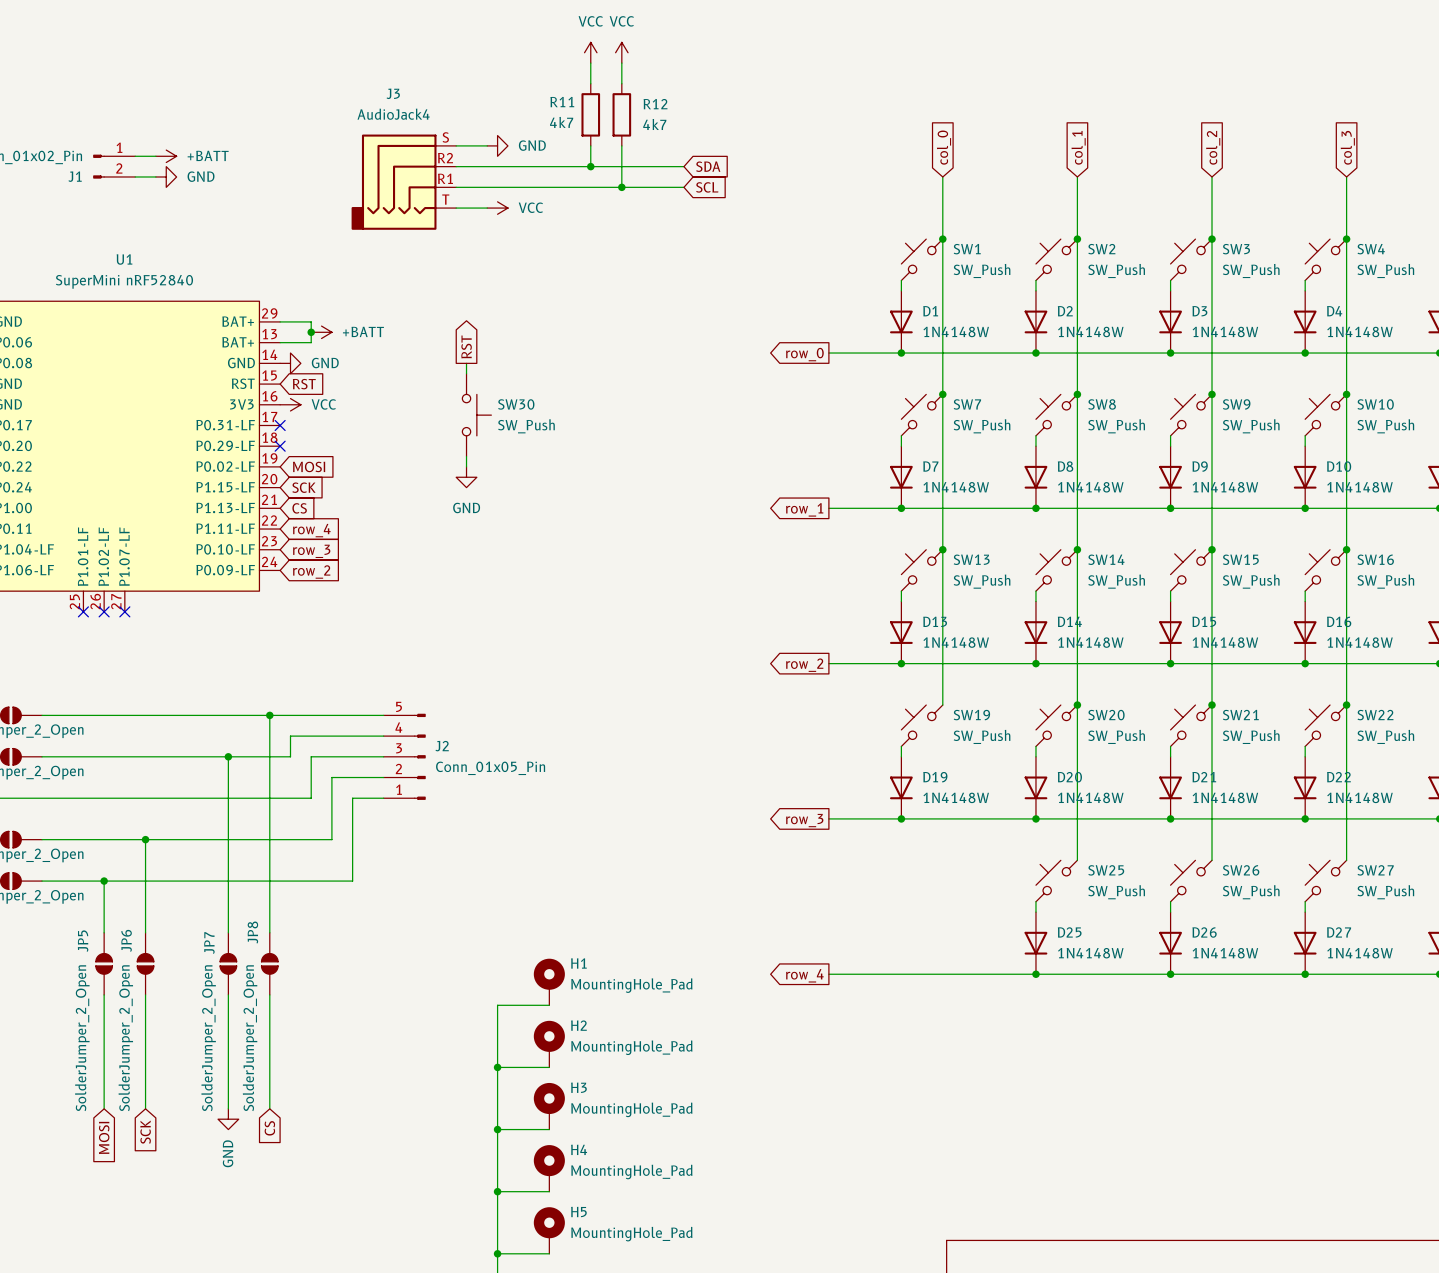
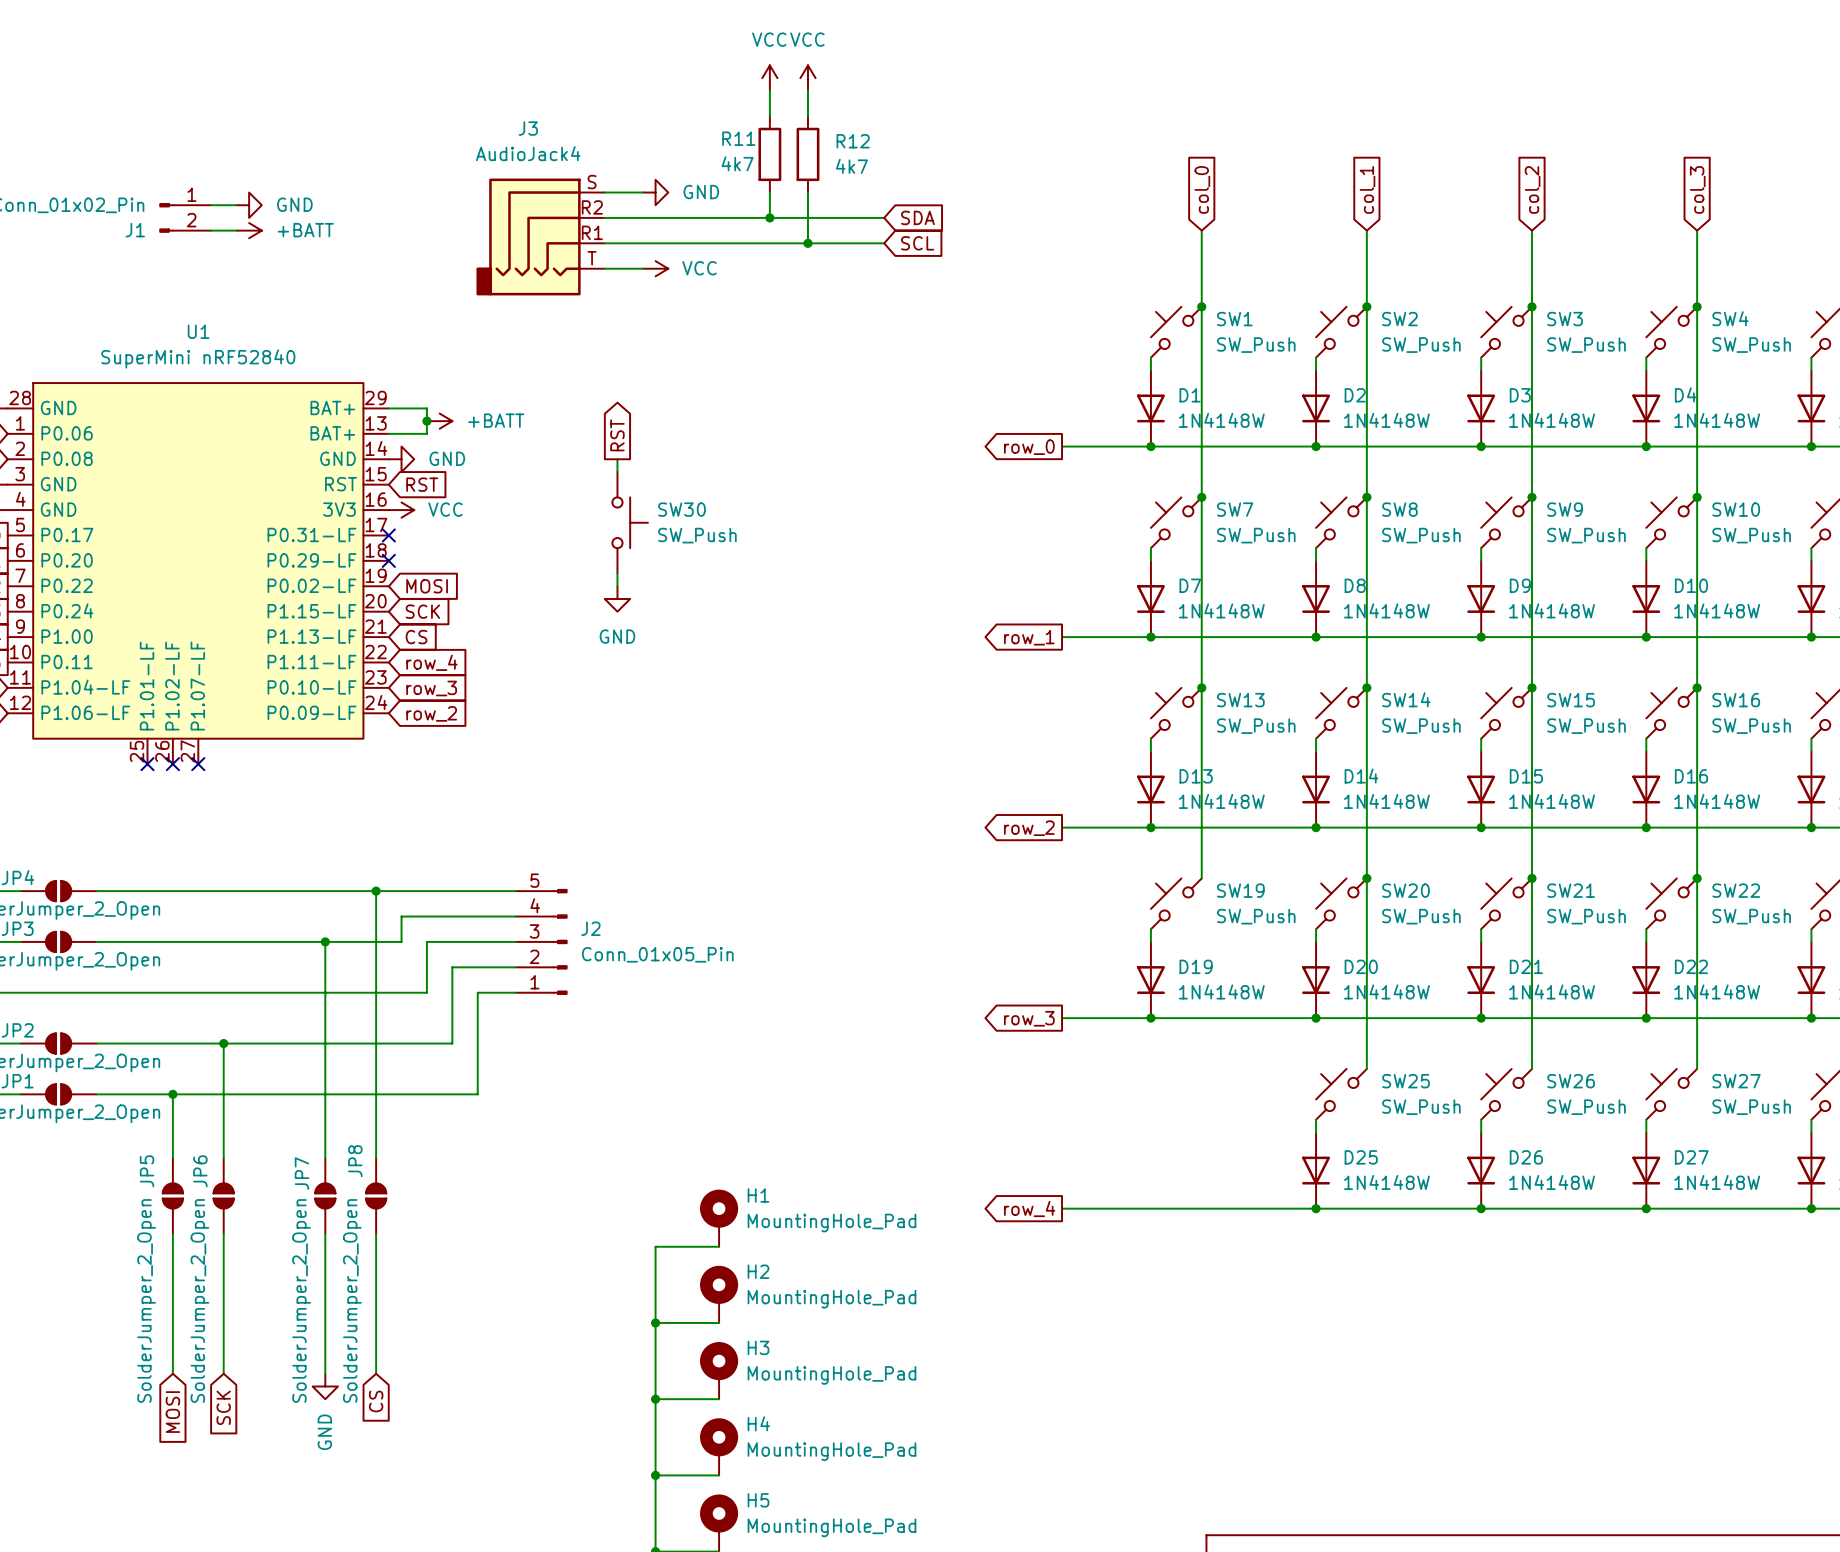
power symbol: +BATT (166, 156) -> GND (249, 205)
power symbol: GND (166, 176) -> +BATT (249, 230)

